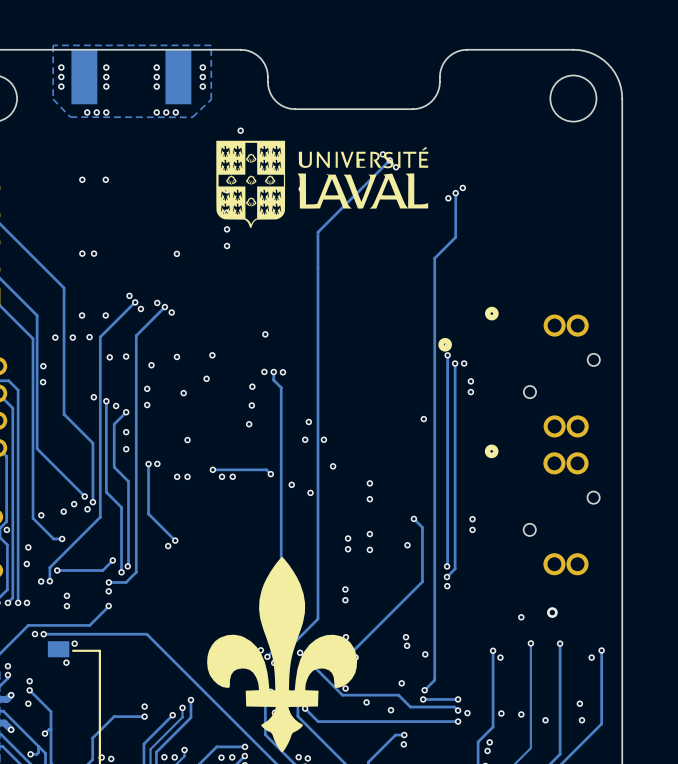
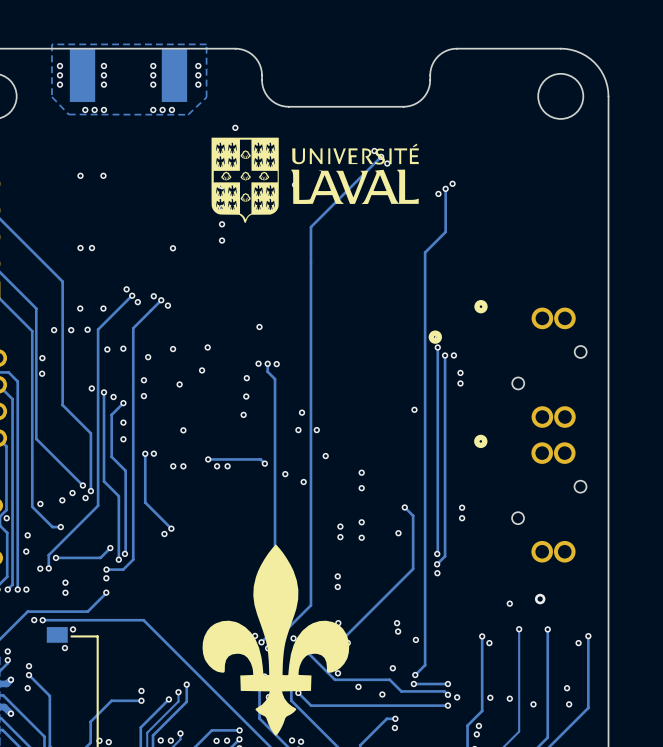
track: (50, 729) (44, 733) -> none
via: (44, 733) -> none
track: (38, 746) (38, 752) (30, 754) -> none
via: (30, 754) -> none

